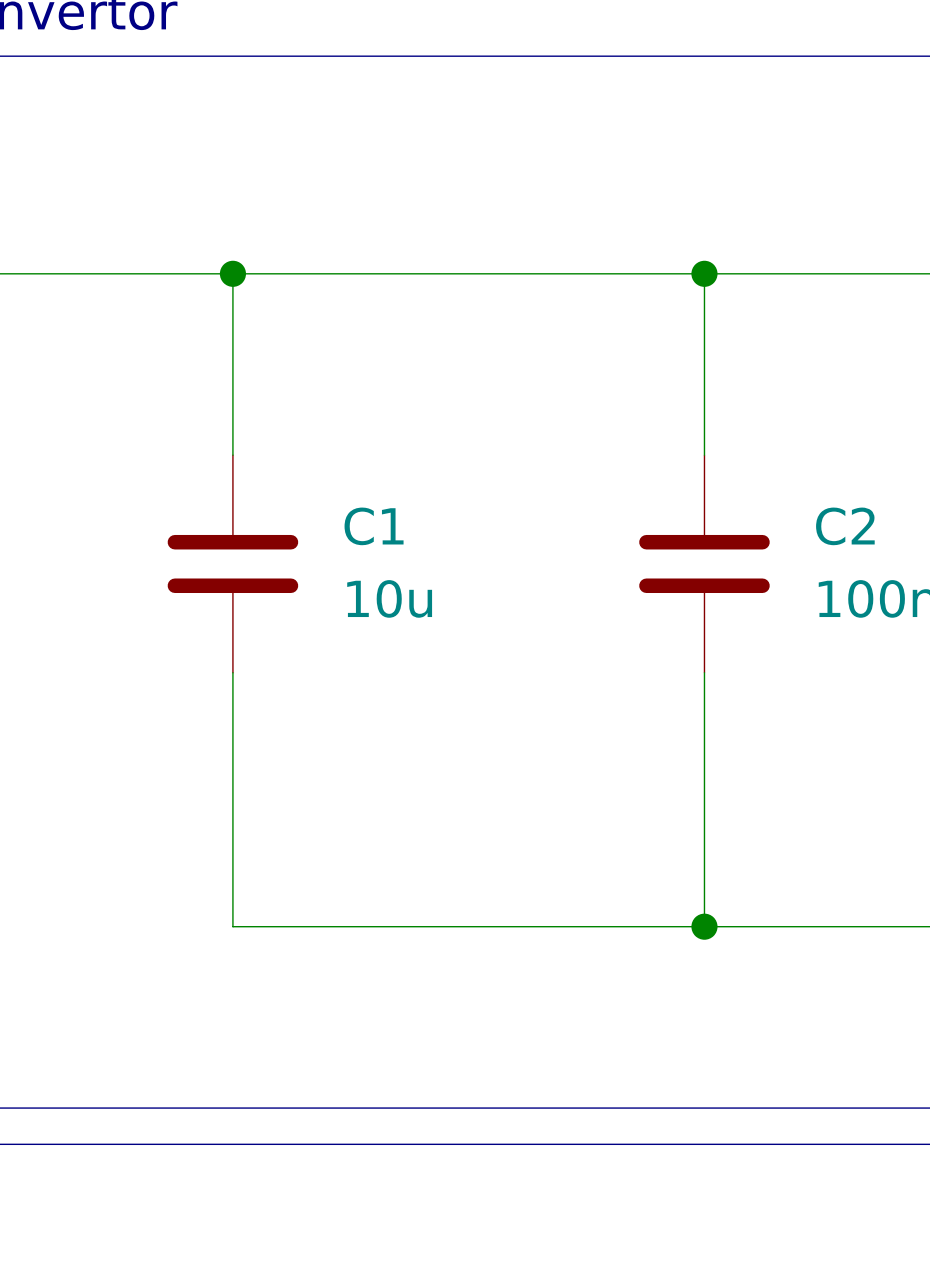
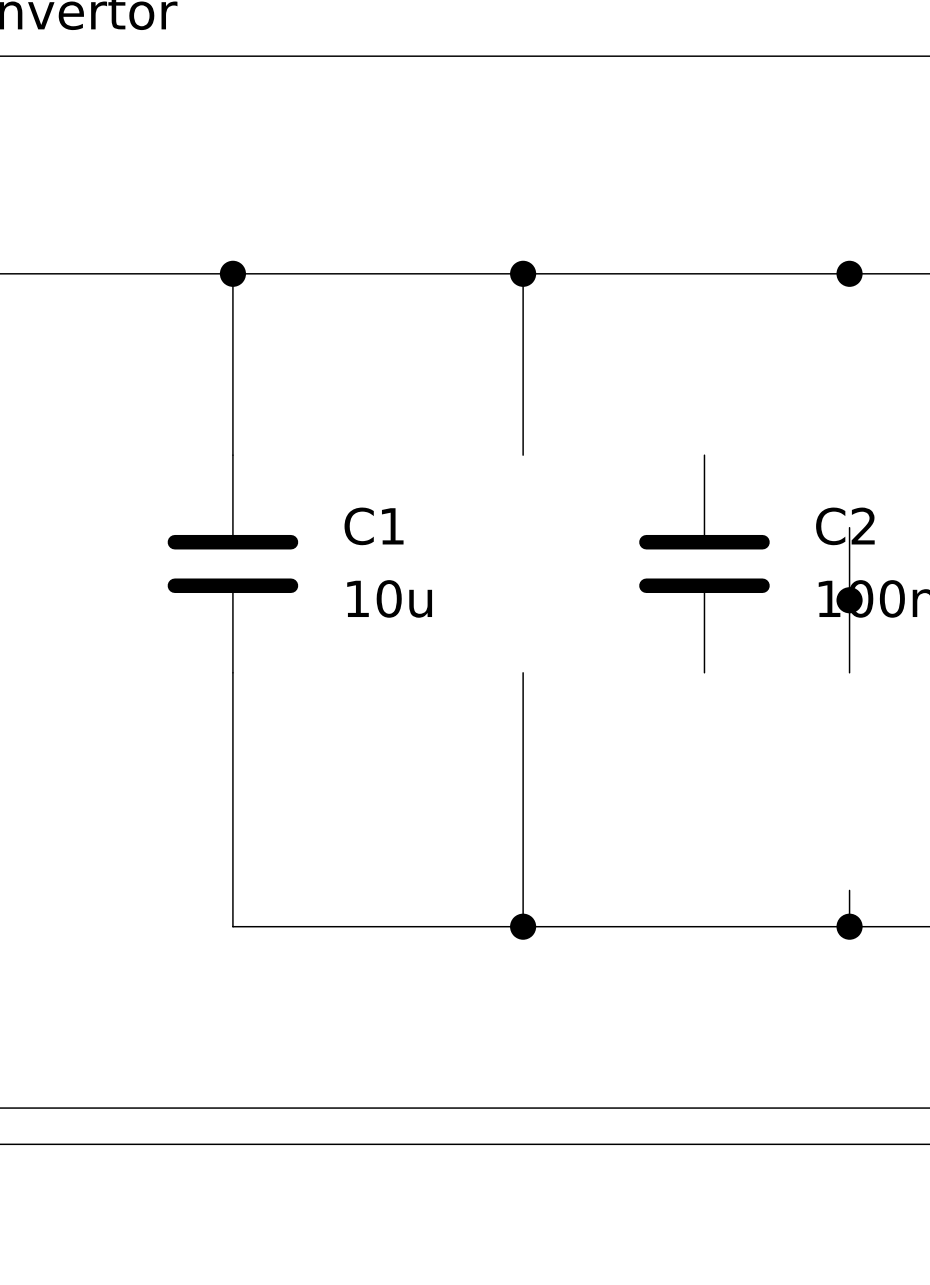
junction: none -> (523, 273)
wire: (704, 273) (704, 455) -> (523, 273) (523, 455)
junction: (704, 273) -> none
junction: none -> (849, 273)
wire: none -> (849, 527) (849, 672)
junction: none -> (849, 600)
wire: (704, 672) (704, 926) -> (523, 672) (523, 926)
wire: none -> (849, 890) (849, 926)
junction: none -> (523, 926)
junction: (704, 926) -> none
junction: none -> (849, 926)

